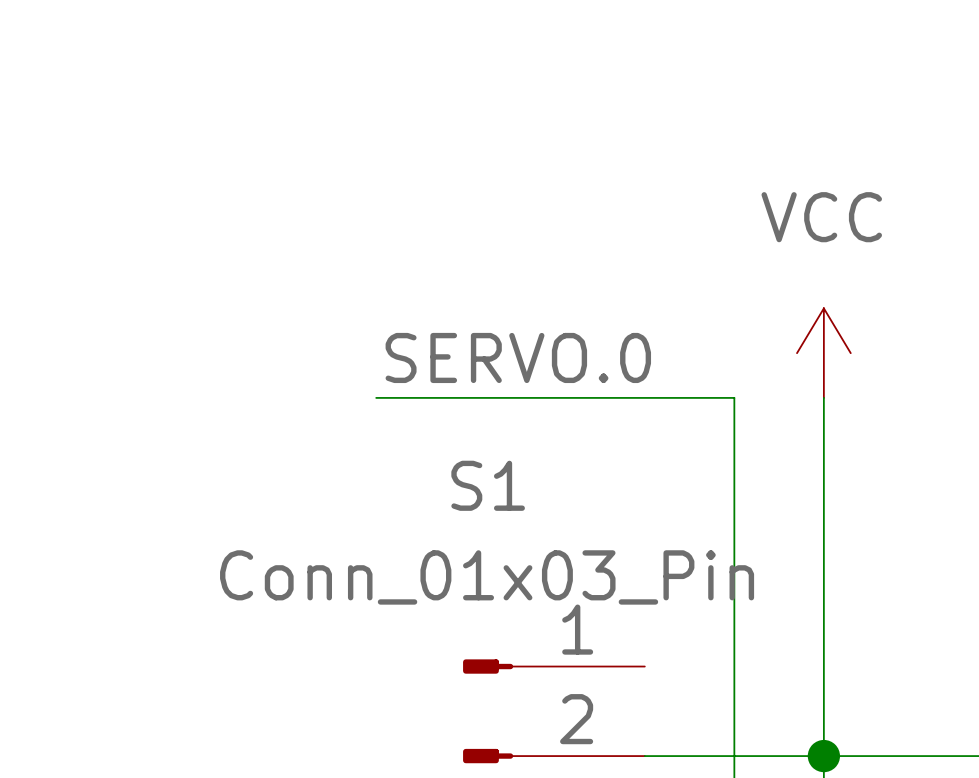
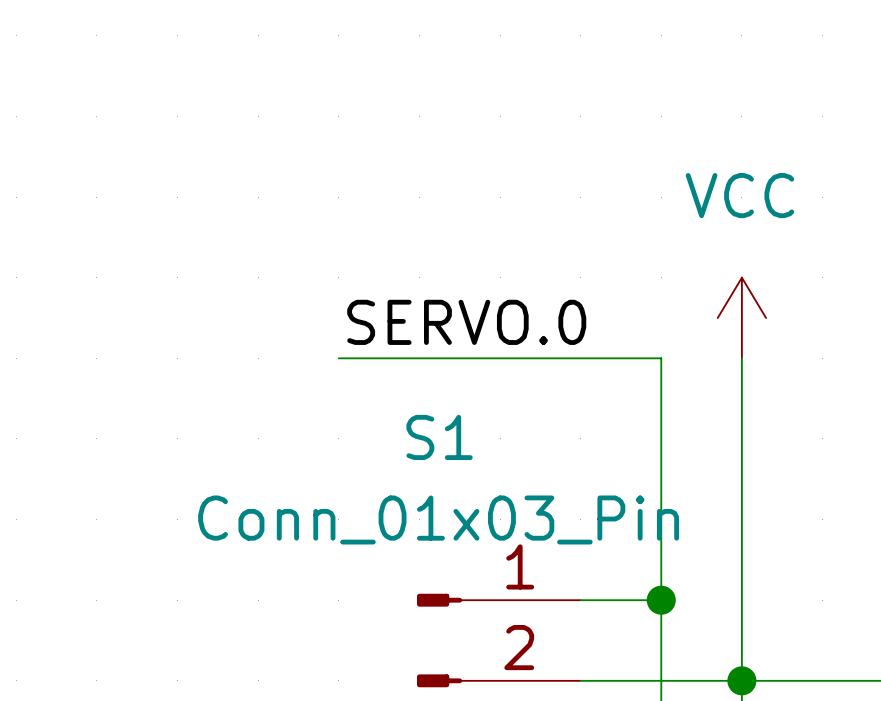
wire: none -> (580, 600) (661, 600)
junction: none -> (661, 600)

